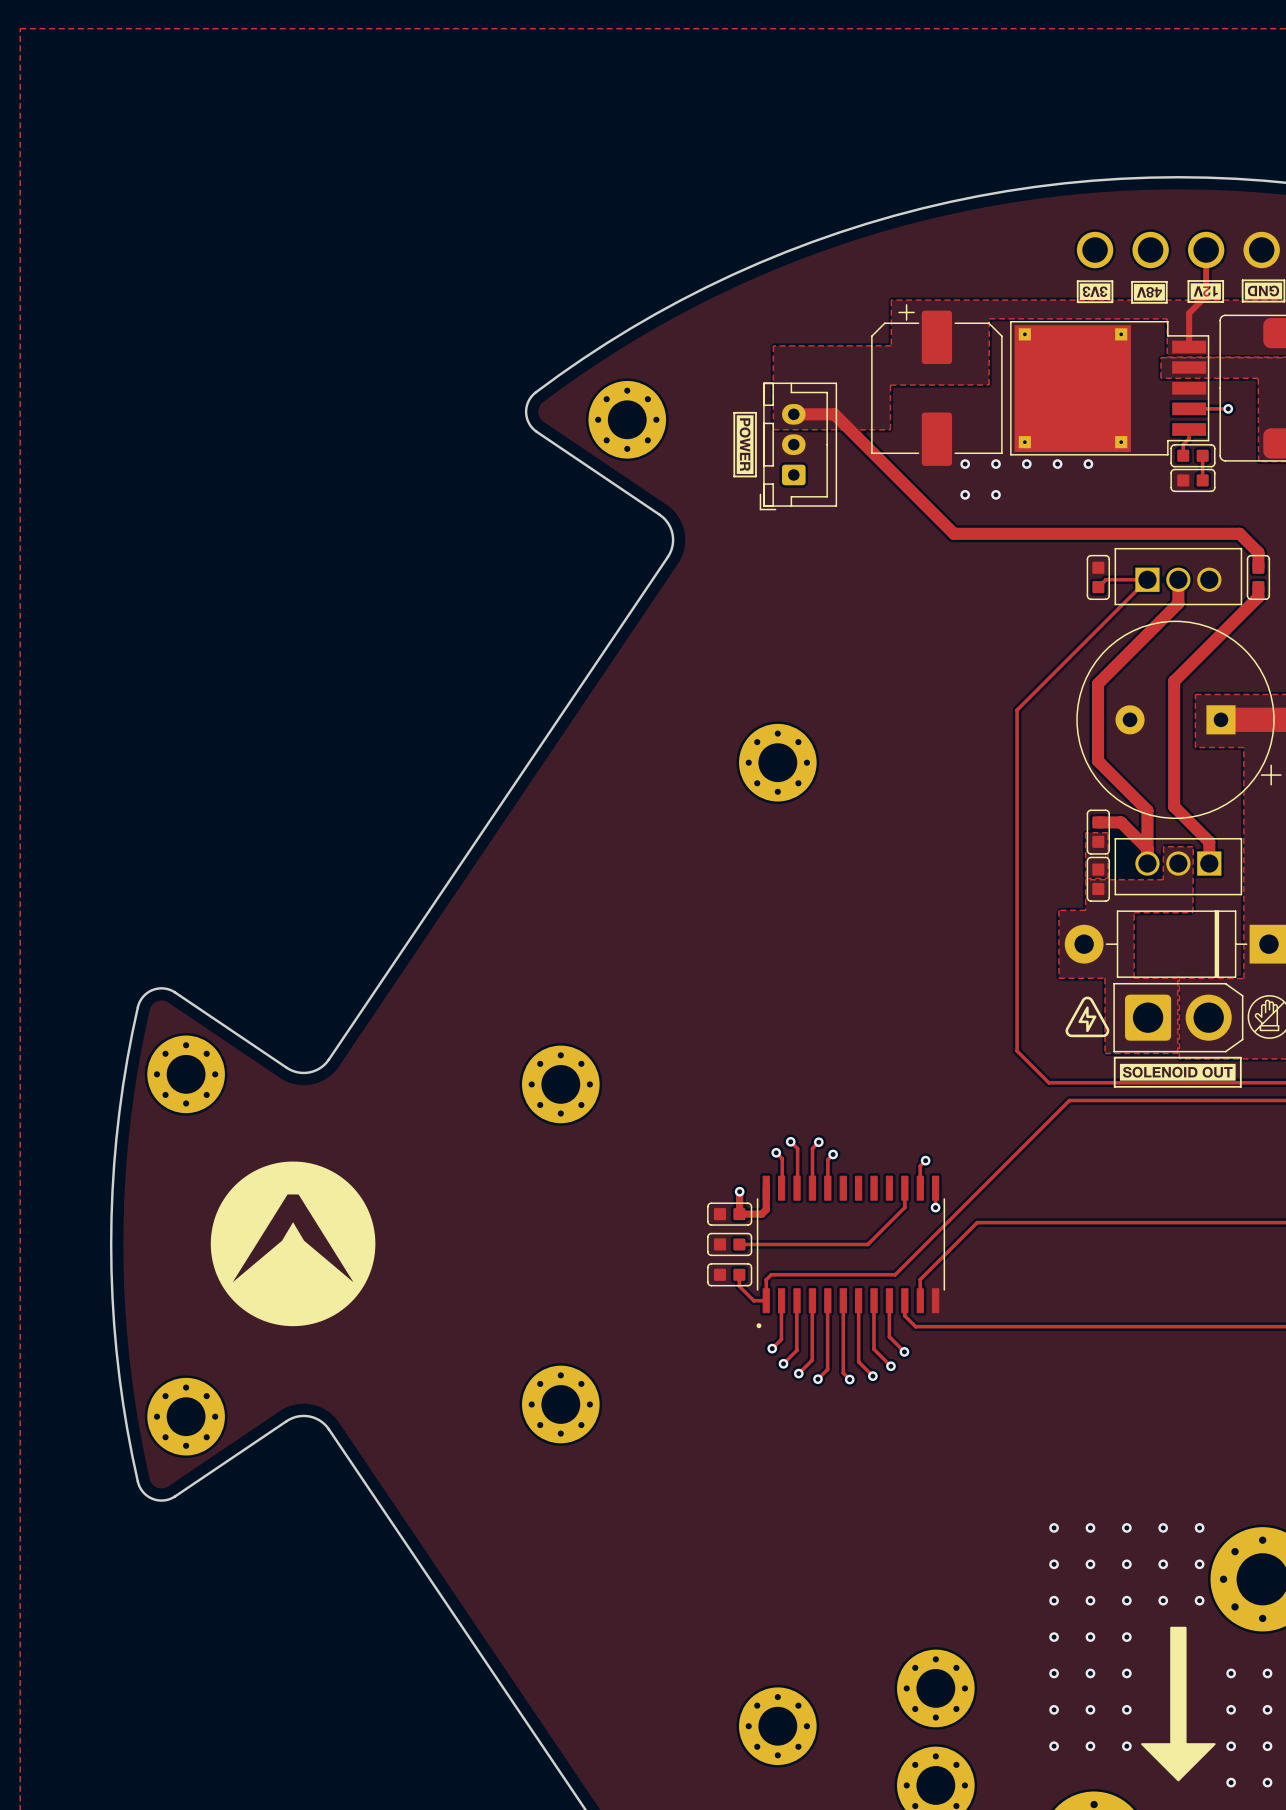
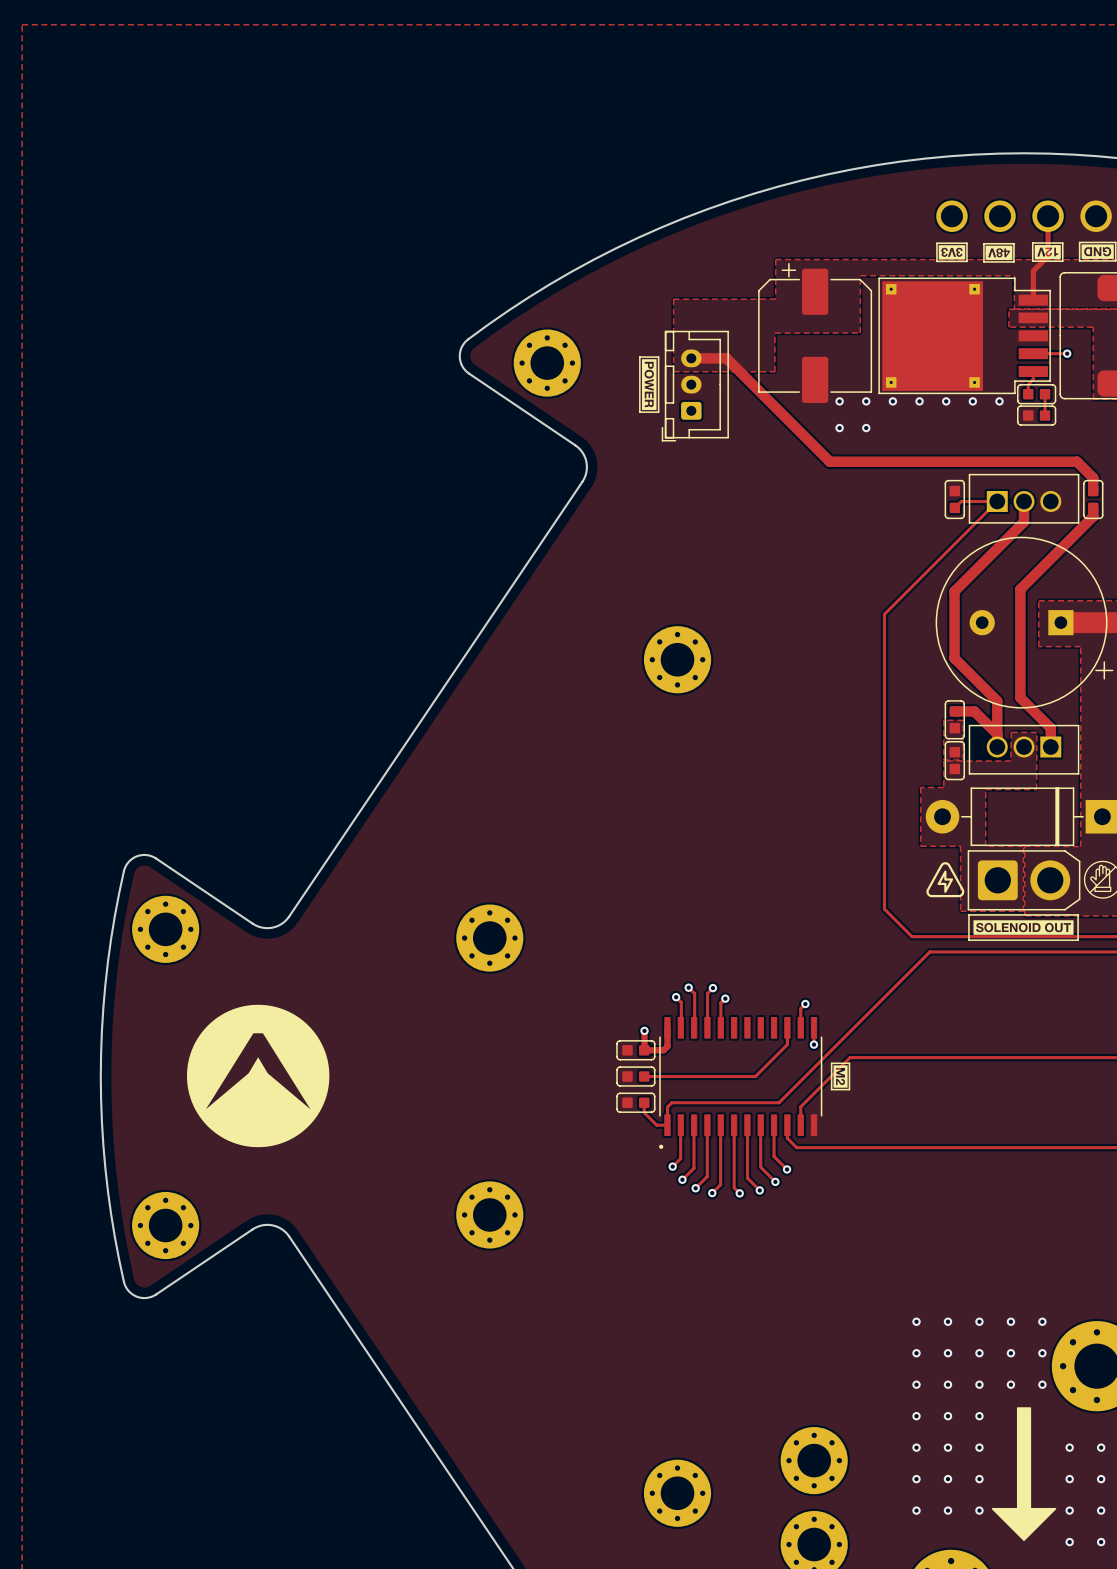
via: none -> (972, 401)
via: none -> (999, 401)
line: none -> (831, 1063) (831, 1089) (849, 1089) (849, 1063) (831, 1063)
drawing: none -> [833, 1065, 848, 1088]

